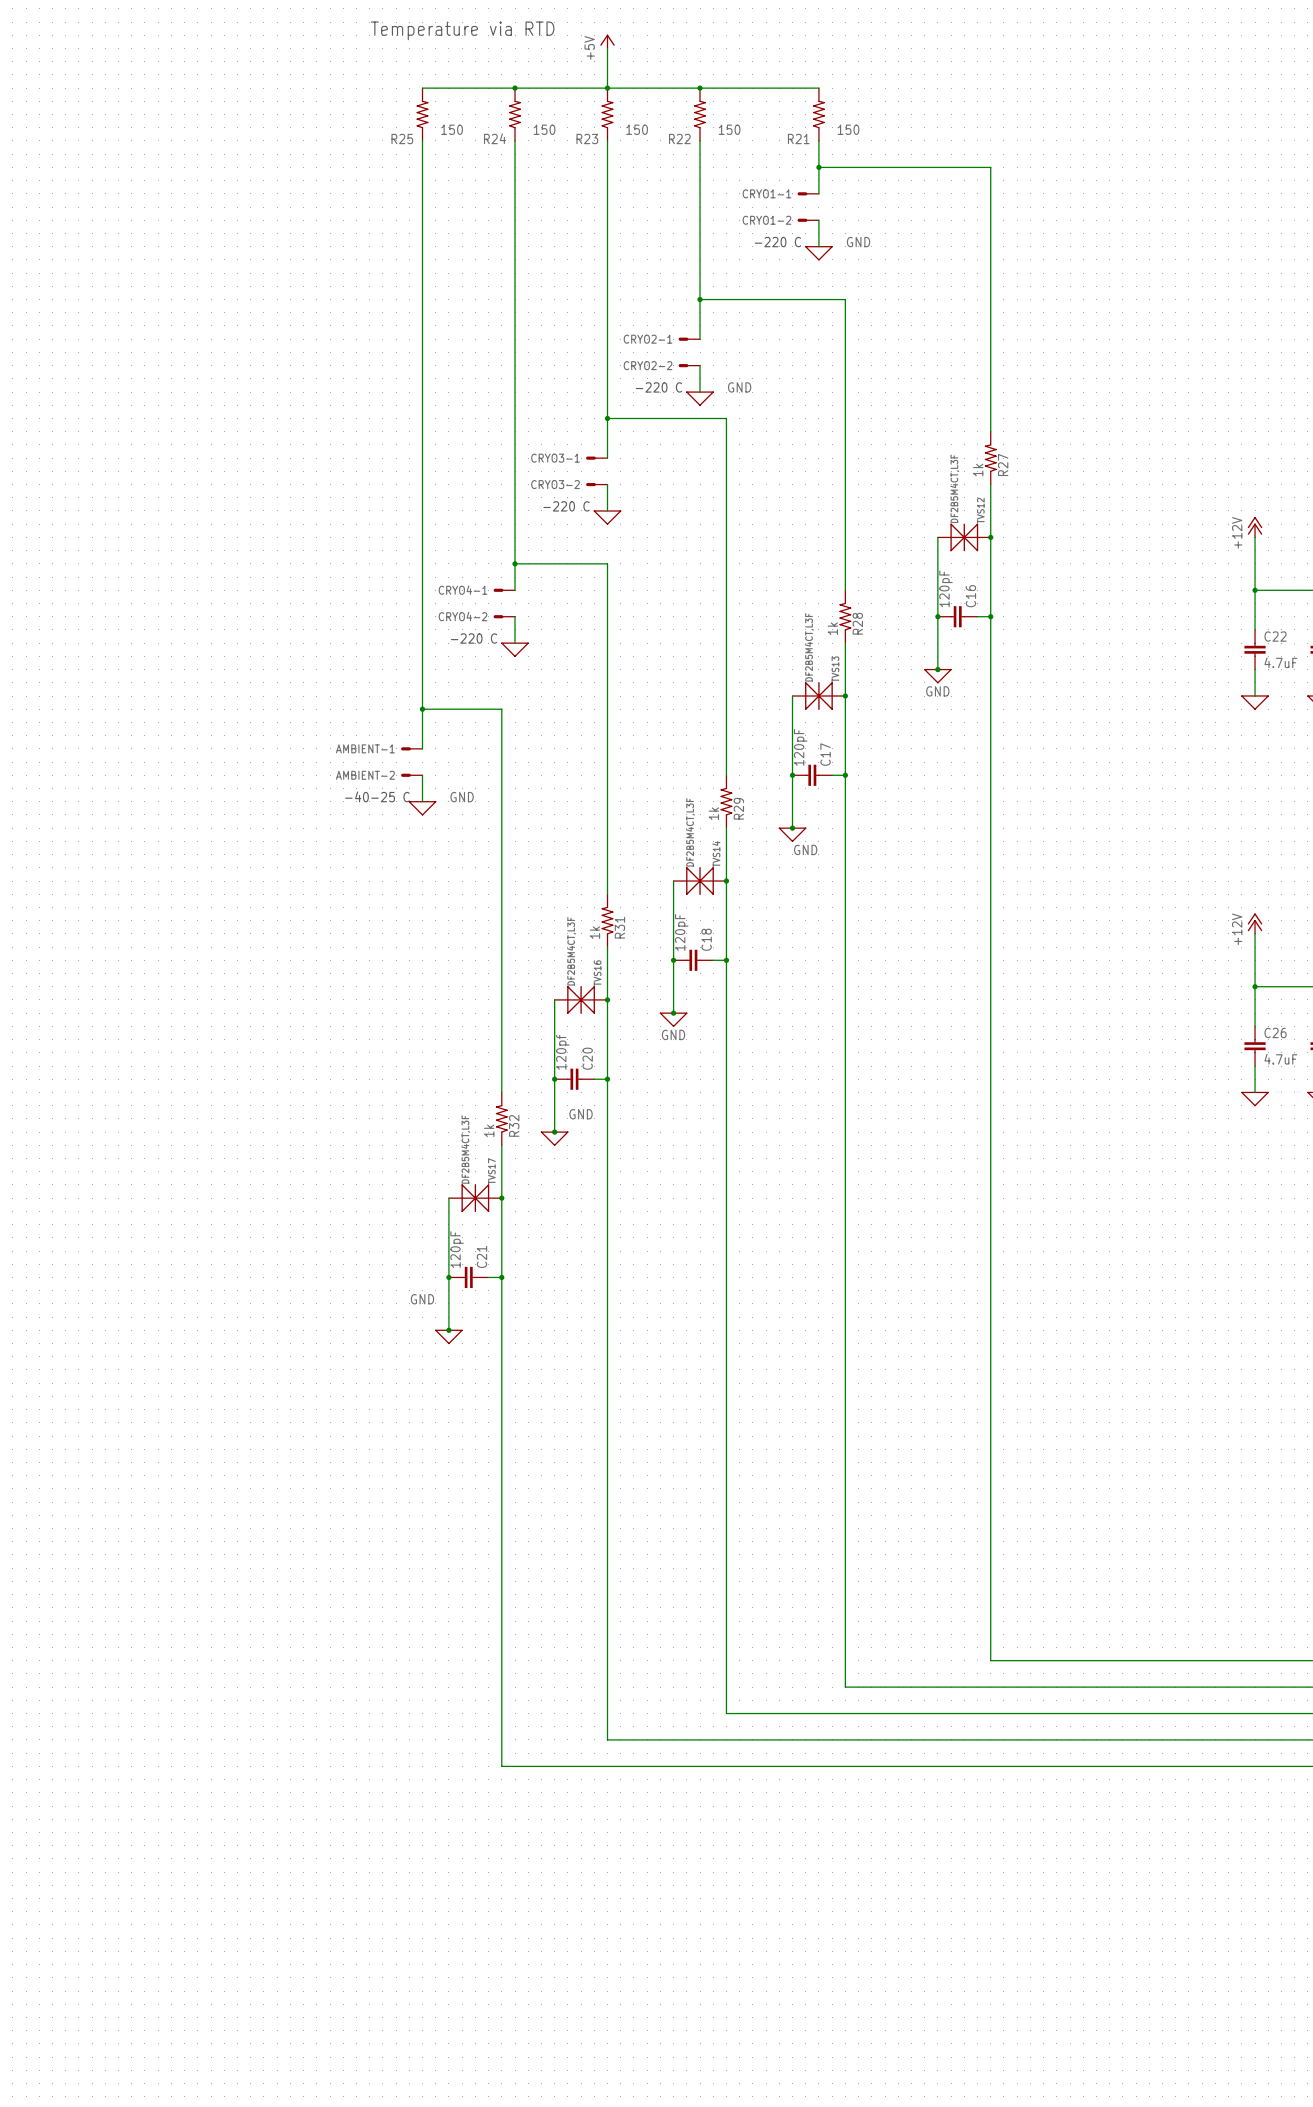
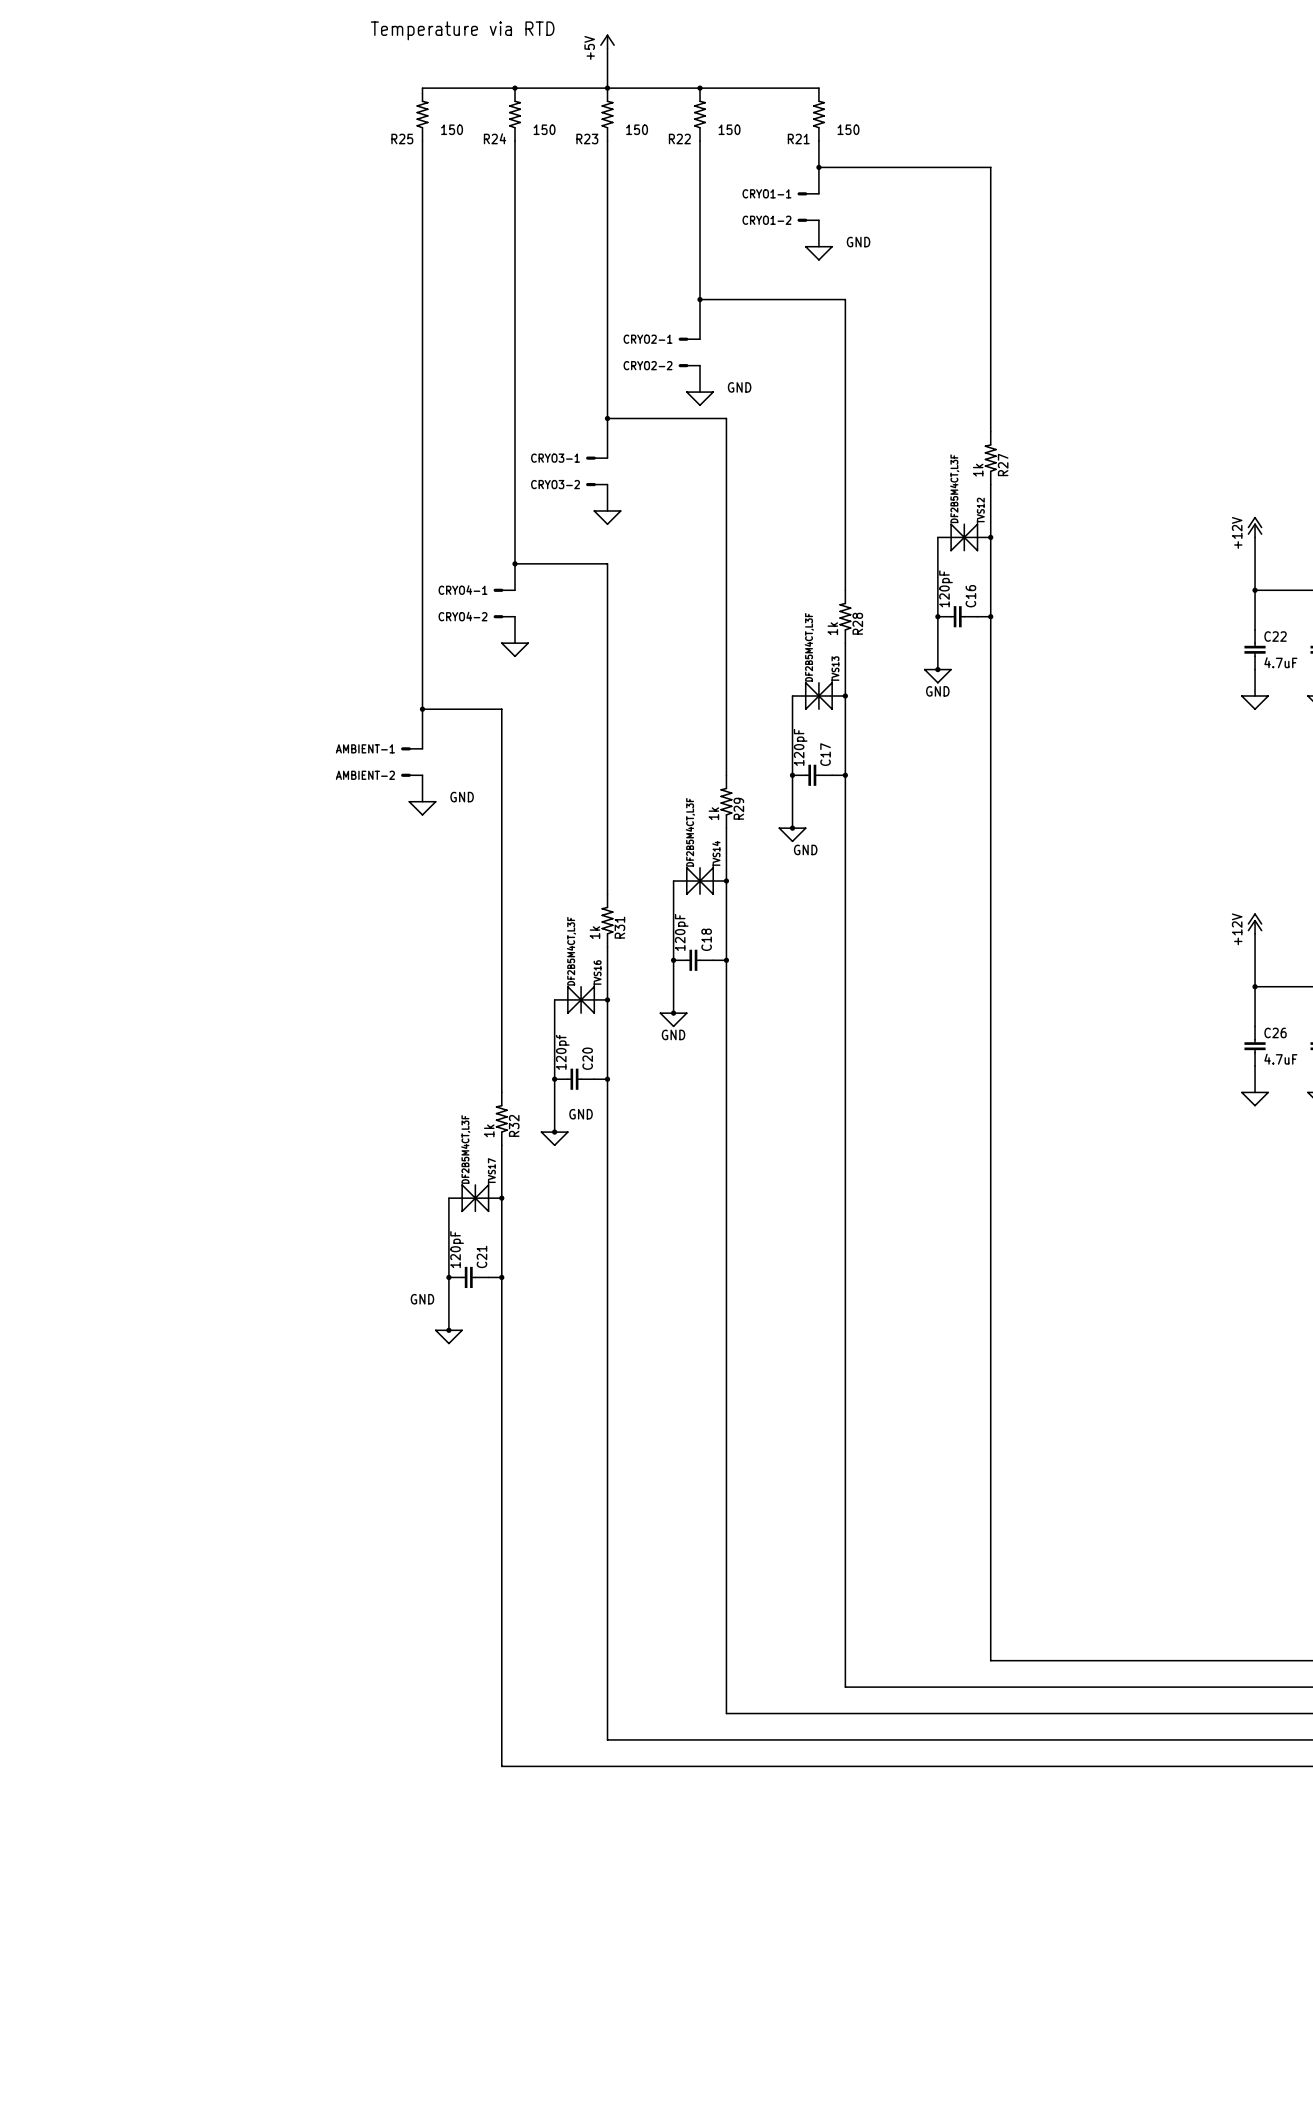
text: -220 C (777, 242) -> none
text: -220 C (659, 387) -> none
text: -220 C (566, 506) -> none
text: -220 C (473, 638) -> none
text: -40-25 C (377, 796) -> none

